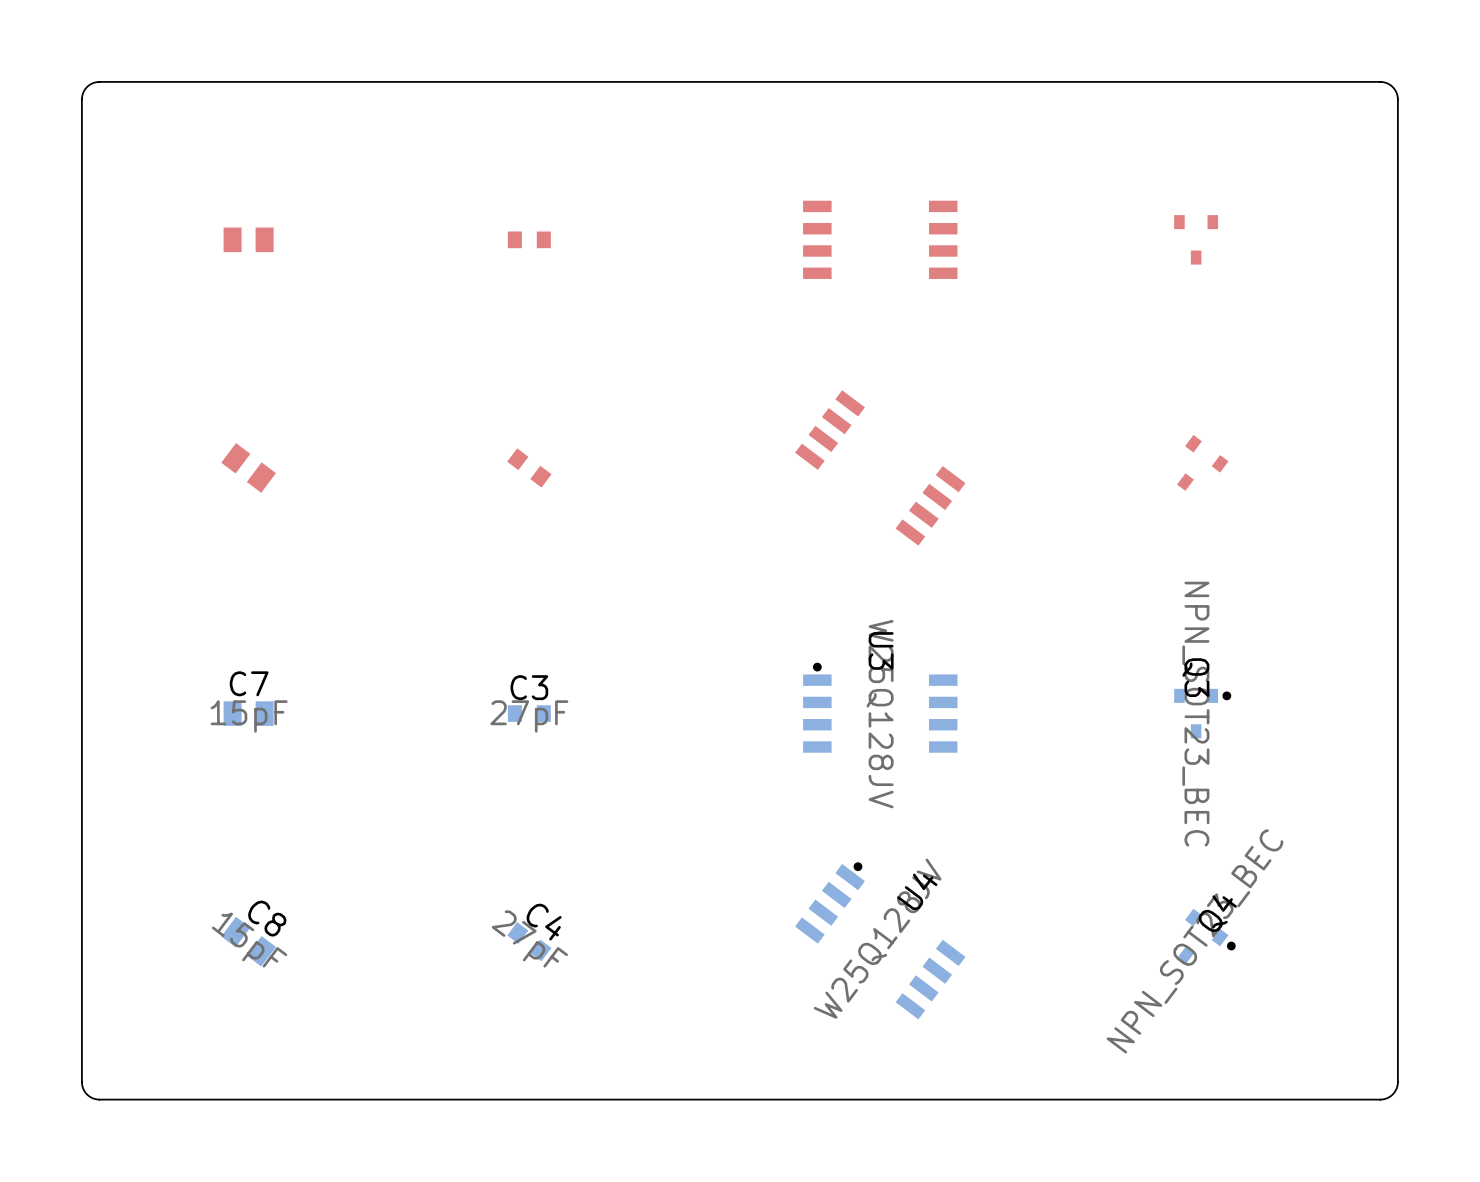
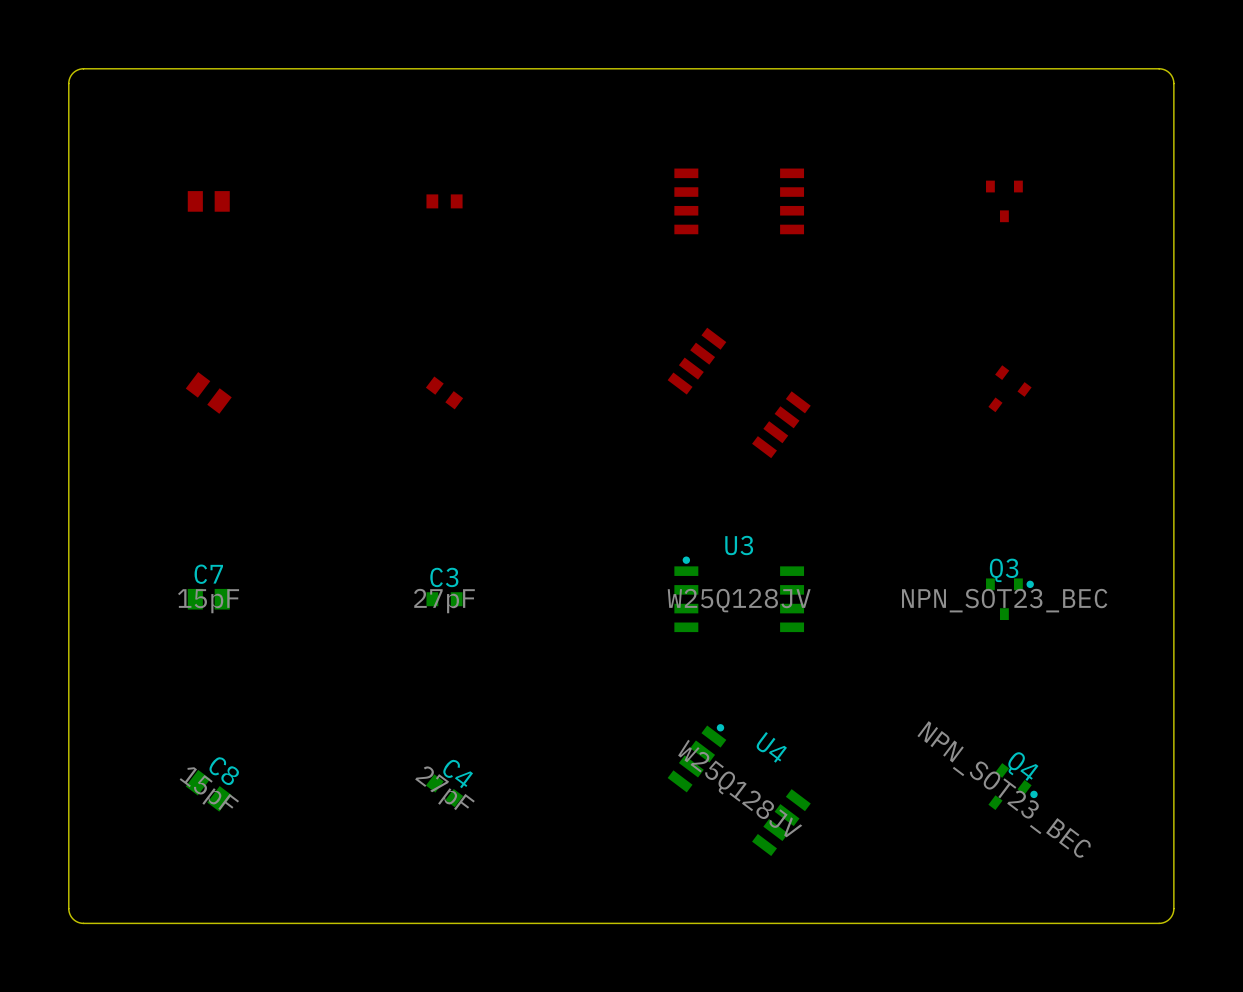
U3 name rotation: 0° (881, 650) -> 90° counterclockwise (739, 545)
Q3 name rotation: 0° (1195, 677) -> 90° counterclockwise (1004, 570)
U3 value rotation: 0° (880, 714) -> 90° counterclockwise (739, 600)
Q3 value rotation: 0° (1195, 714) -> 90° counterclockwise (1004, 600)
U4 name rotation: 0° (917, 891) -> 90° clockwise (771, 747)
Q4 name rotation: 0° (1217, 913) -> 90° clockwise (1023, 766)
U4 value rotation: 0° (877, 938) -> 90° clockwise (740, 788)
Q4 value rotation: 0° (1195, 941) -> 90° clockwise (1004, 789)

